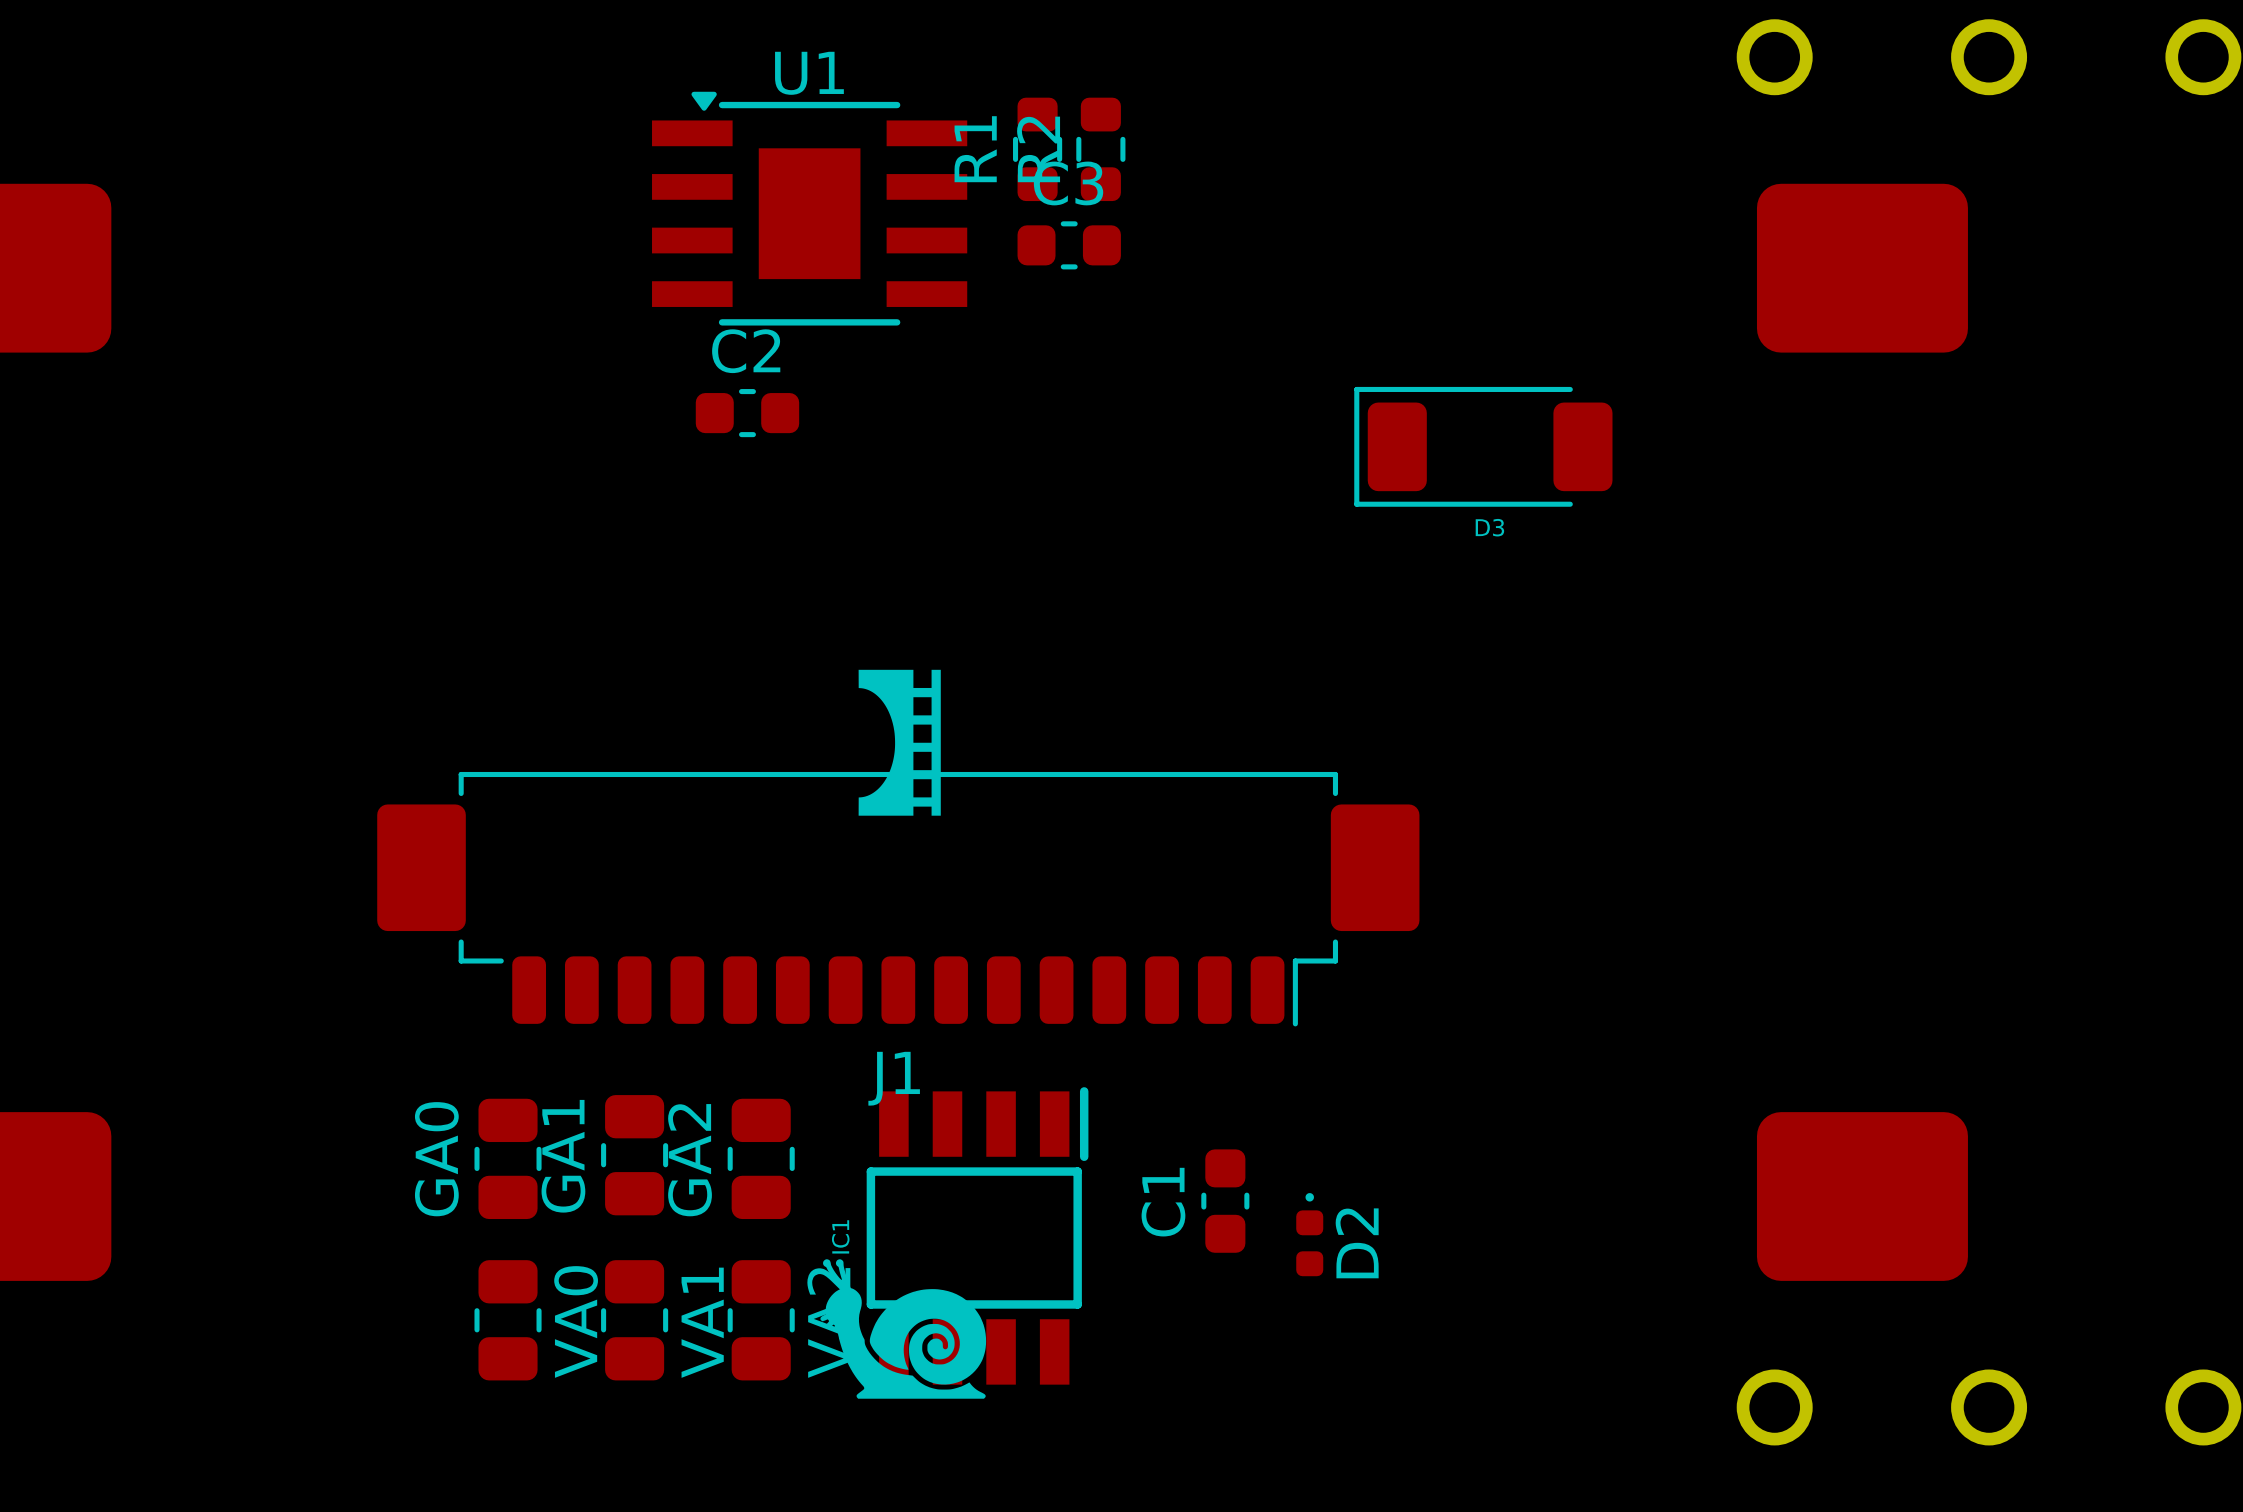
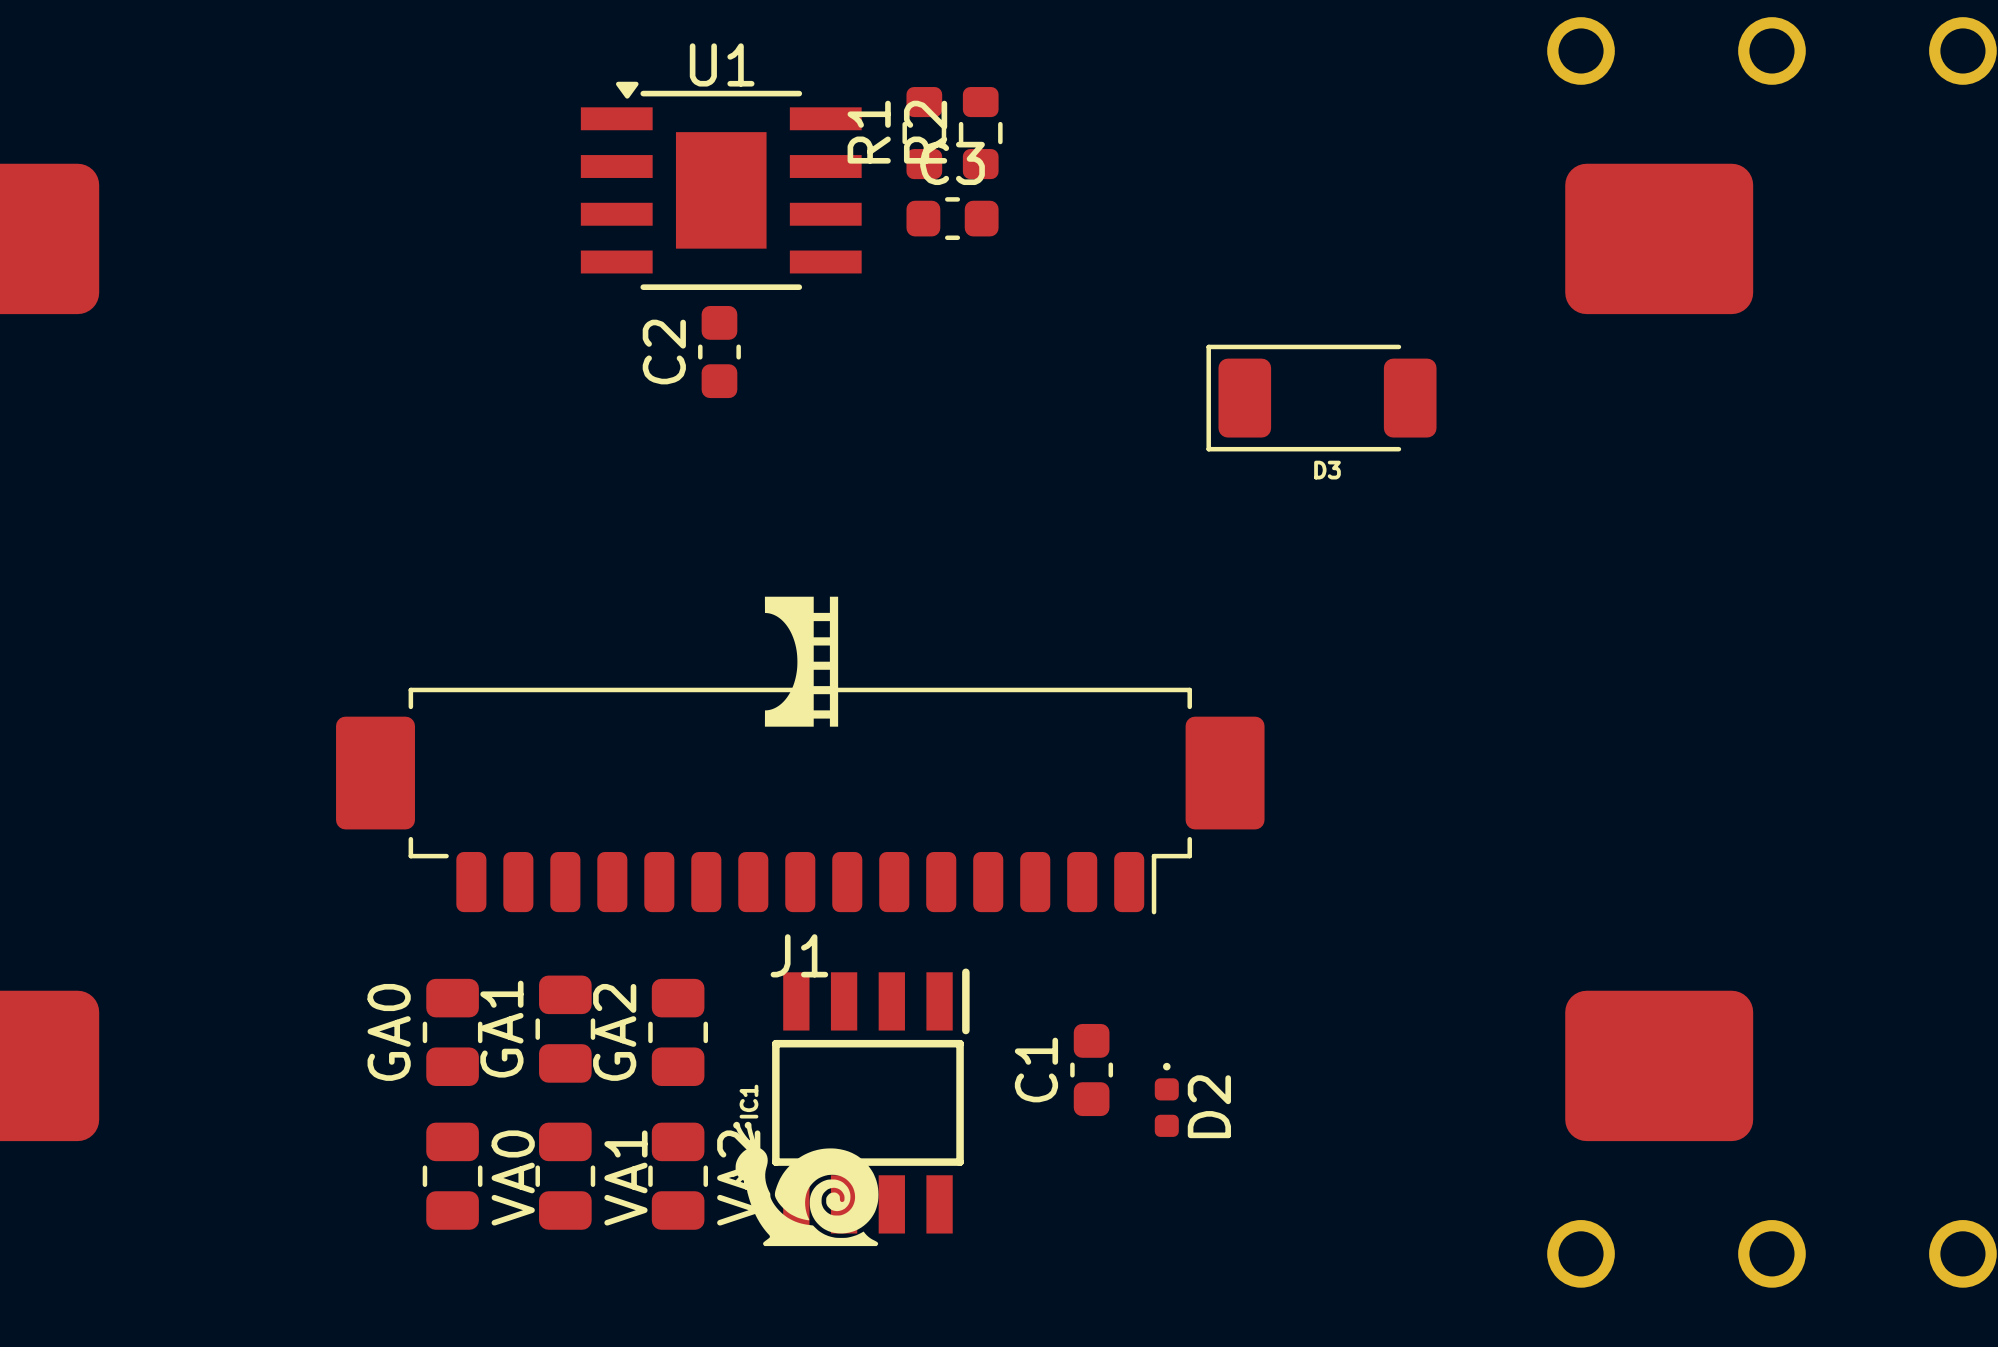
C2 name position: C2 (746, 351) -> C2 (664, 352)
C2 rotation: 0° (747, 413) -> 90° clockwise (719, 352)
C2 position: (747, 413) -> (719, 352)

